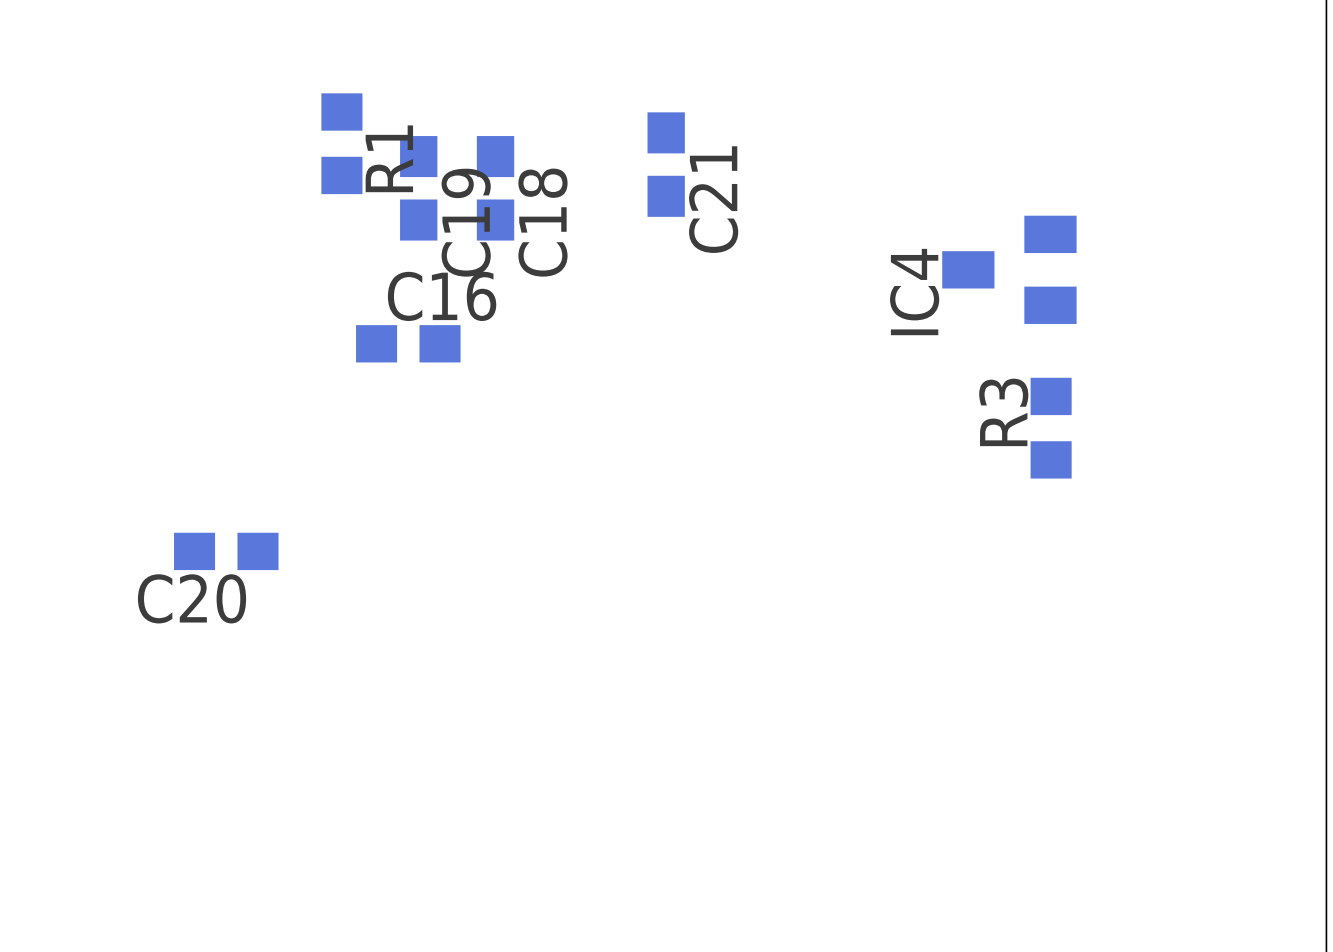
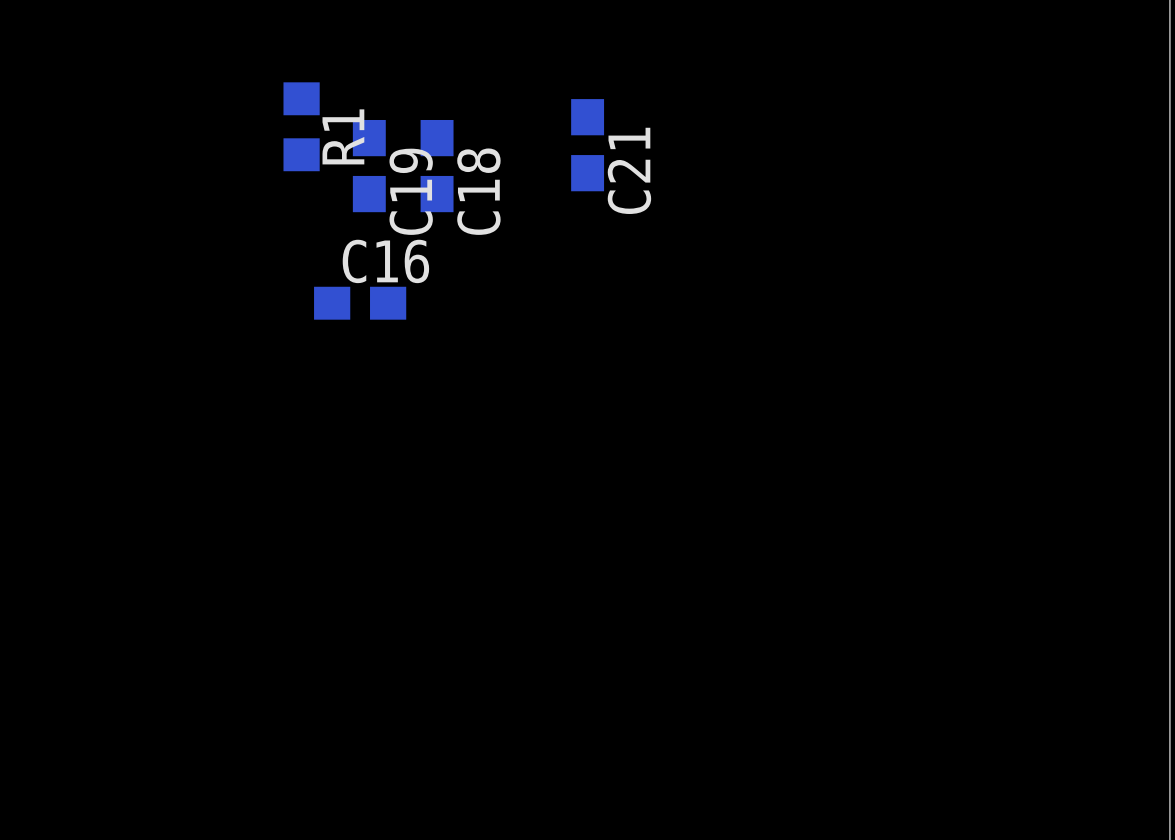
IC4: (1009, 269) -> none
R3: (1051, 428) -> none
C20: (226, 551) -> none

